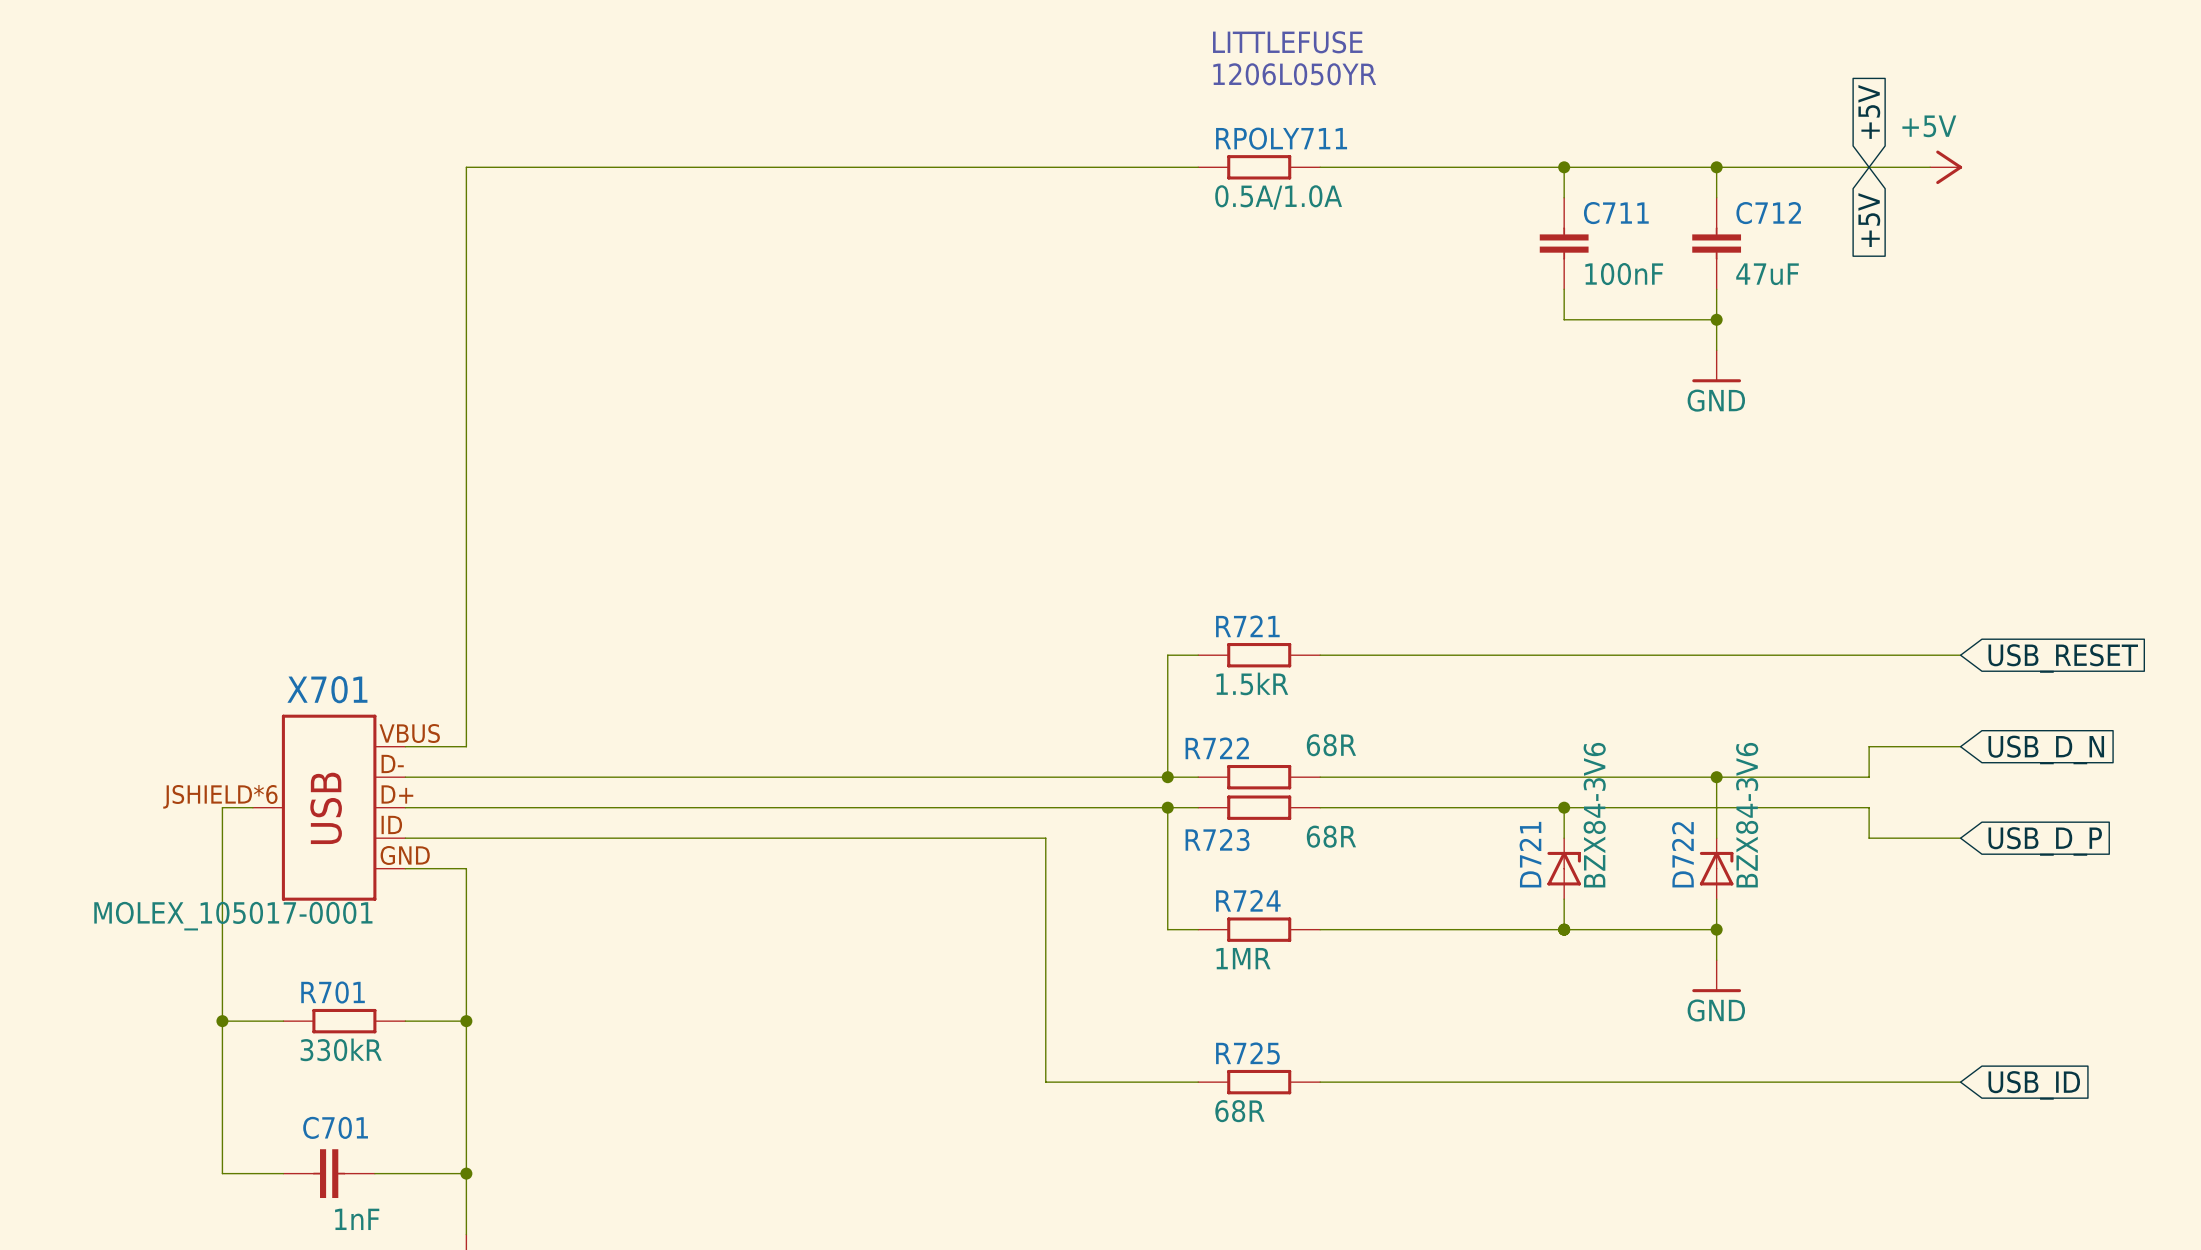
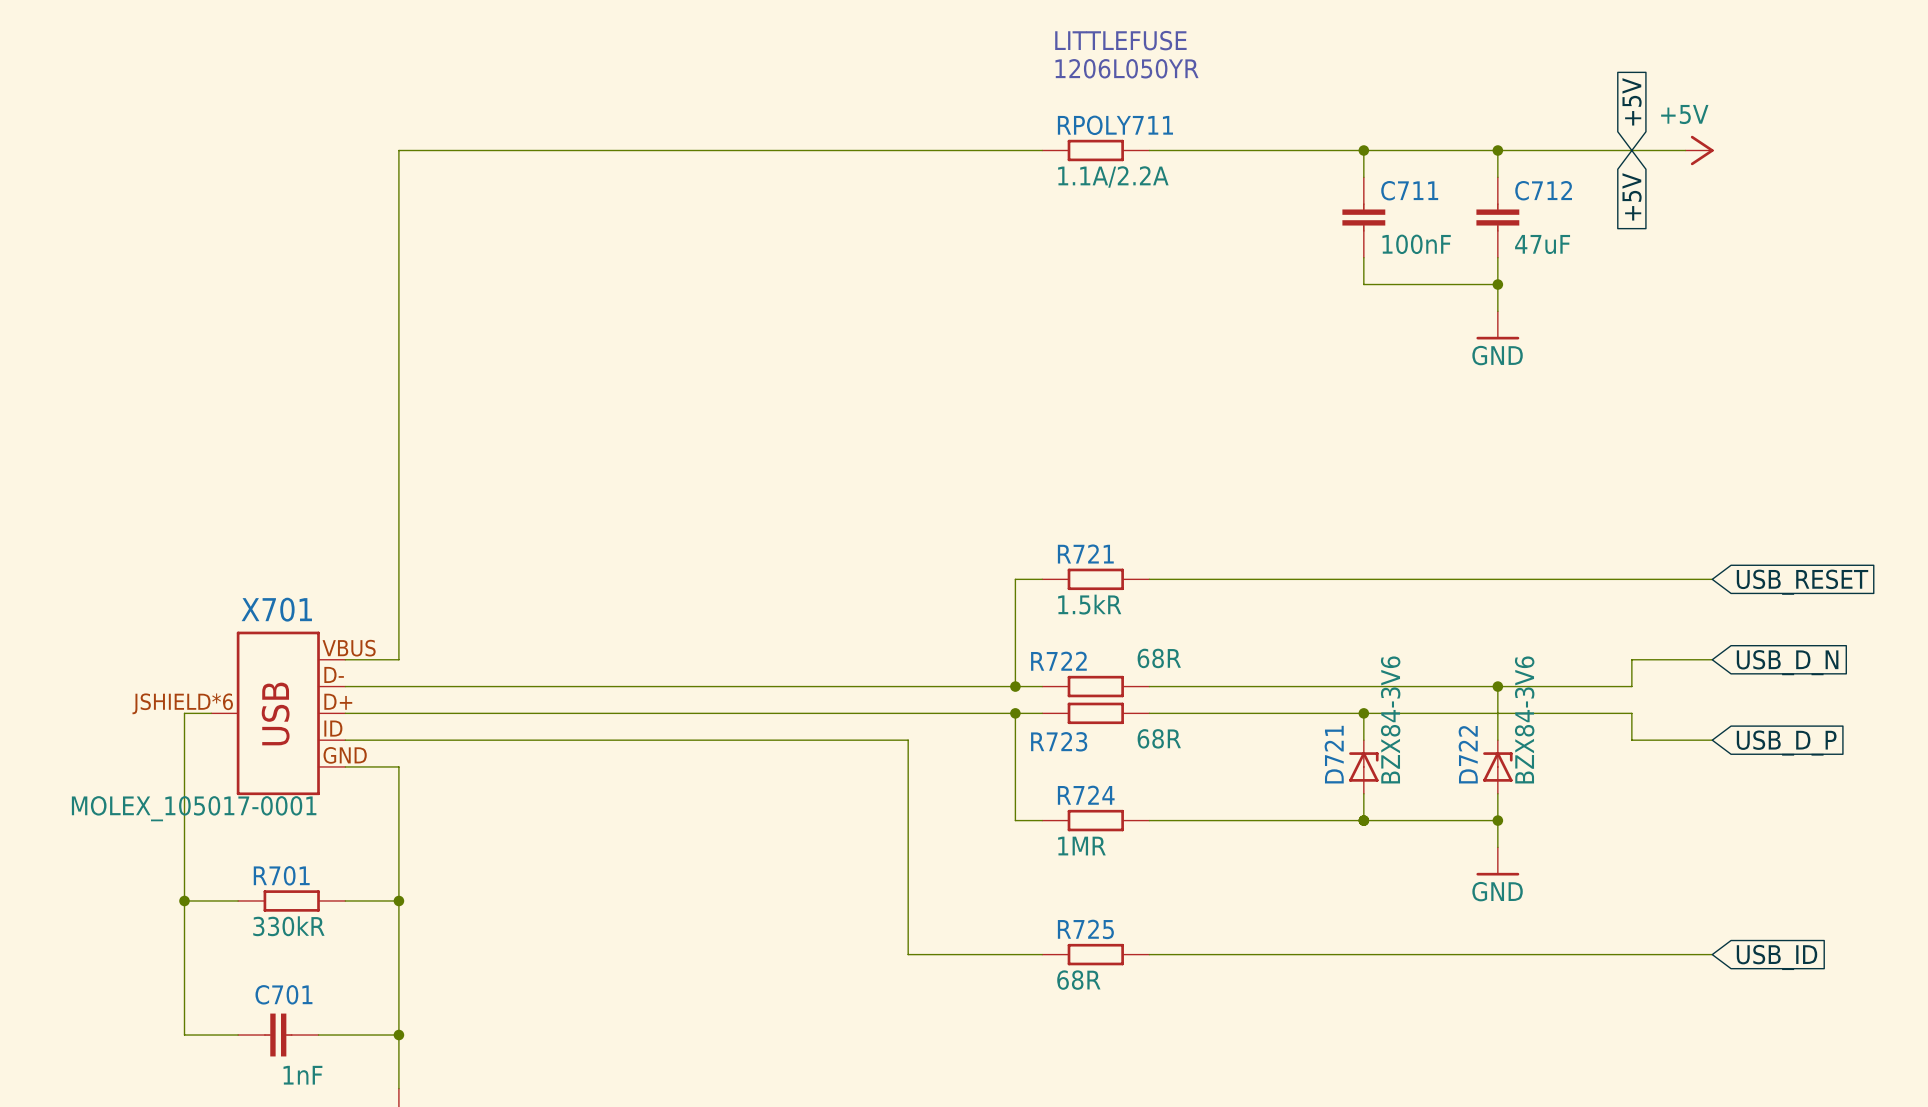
RPOLY711 value: 0.5A/1.0A (1278, 197) -> 1.1A/2.2A (1113, 176)

